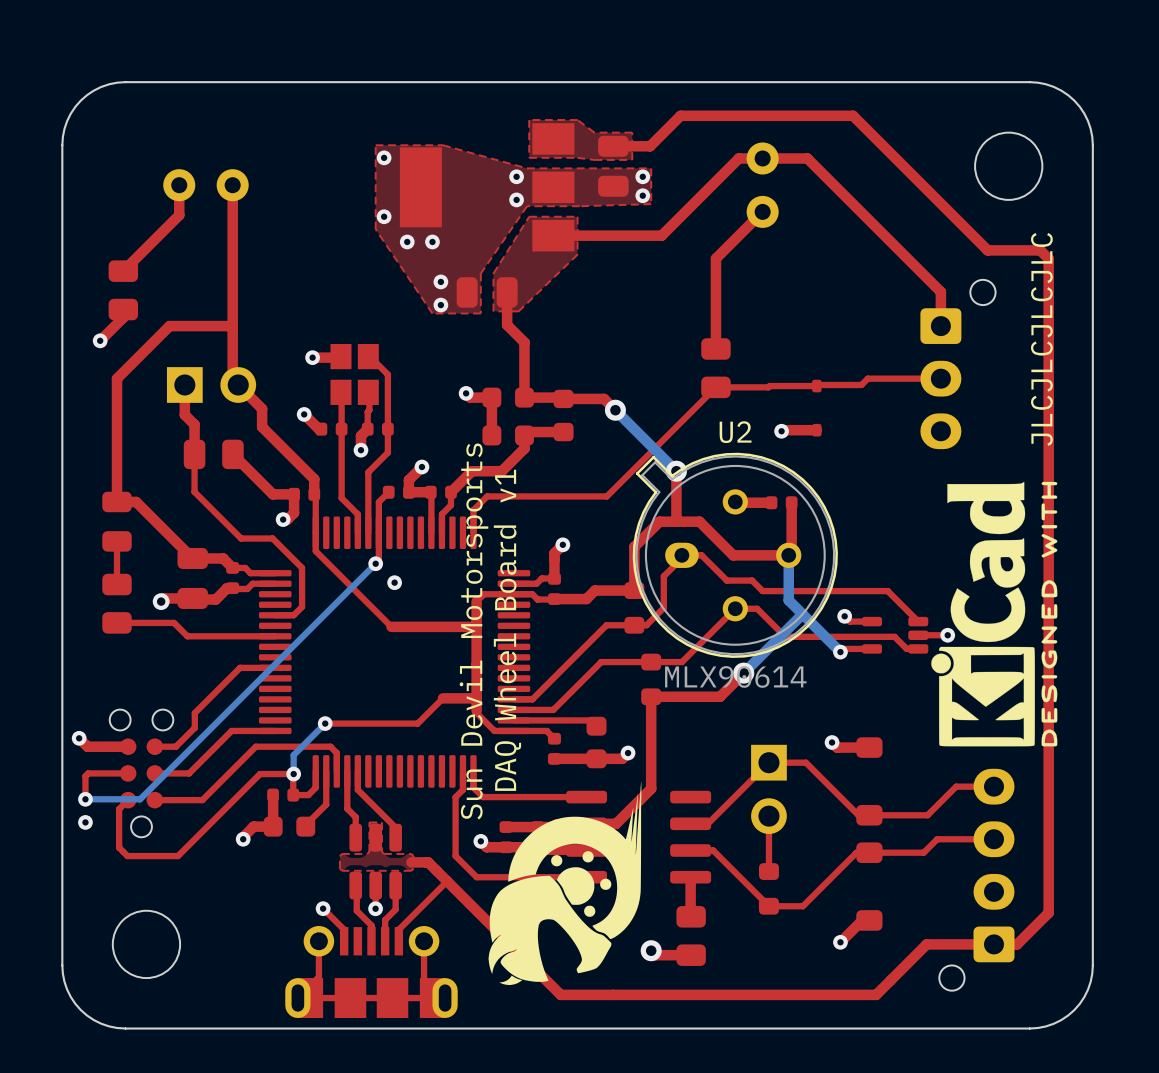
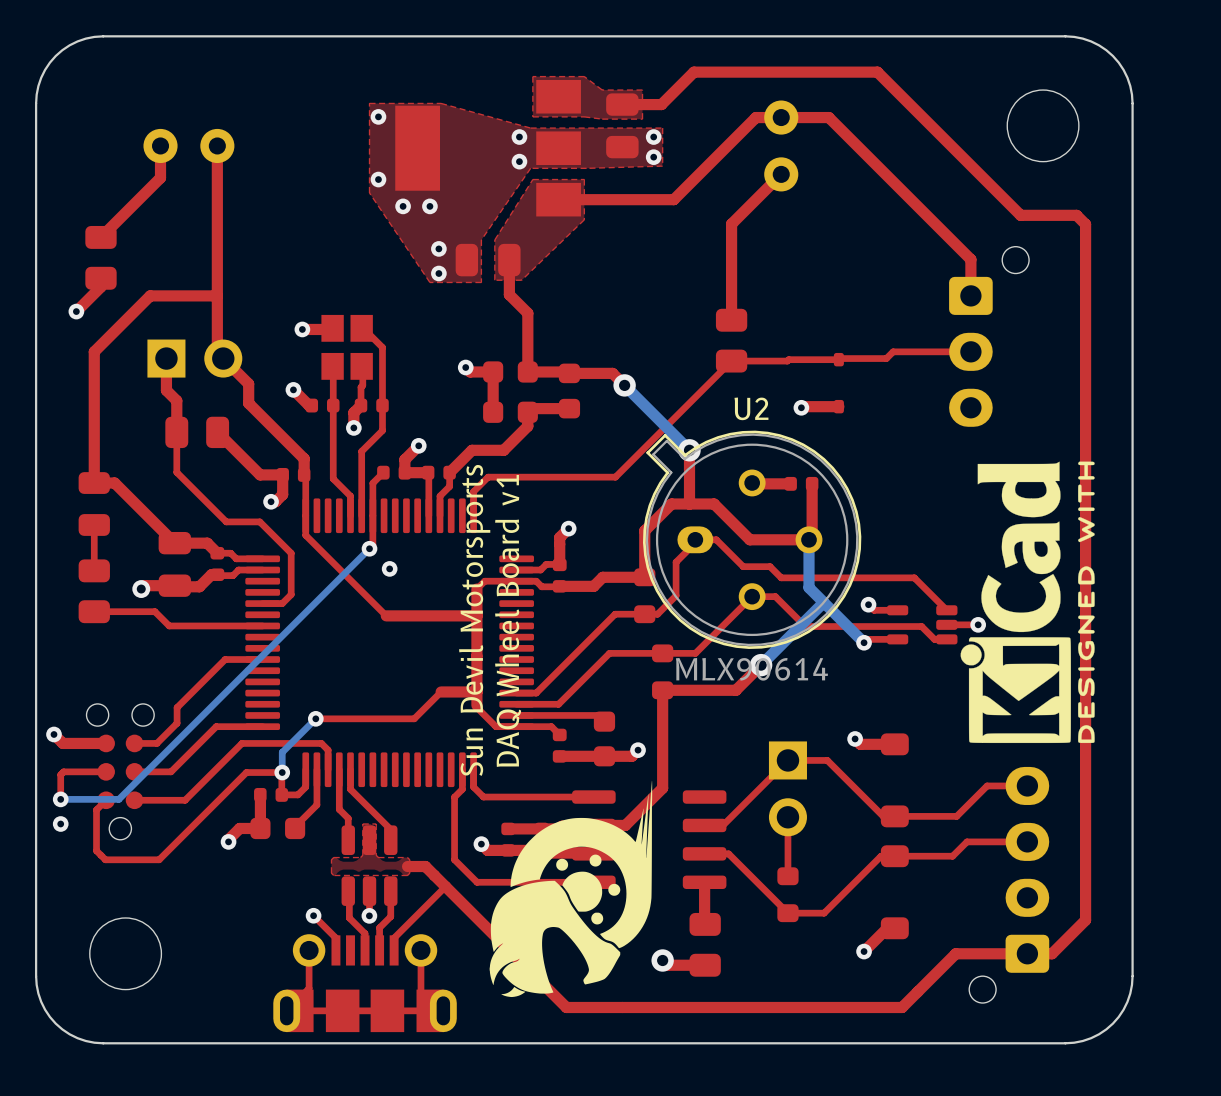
text: JLCJLCJLCJLC (1041, 339) -> none

